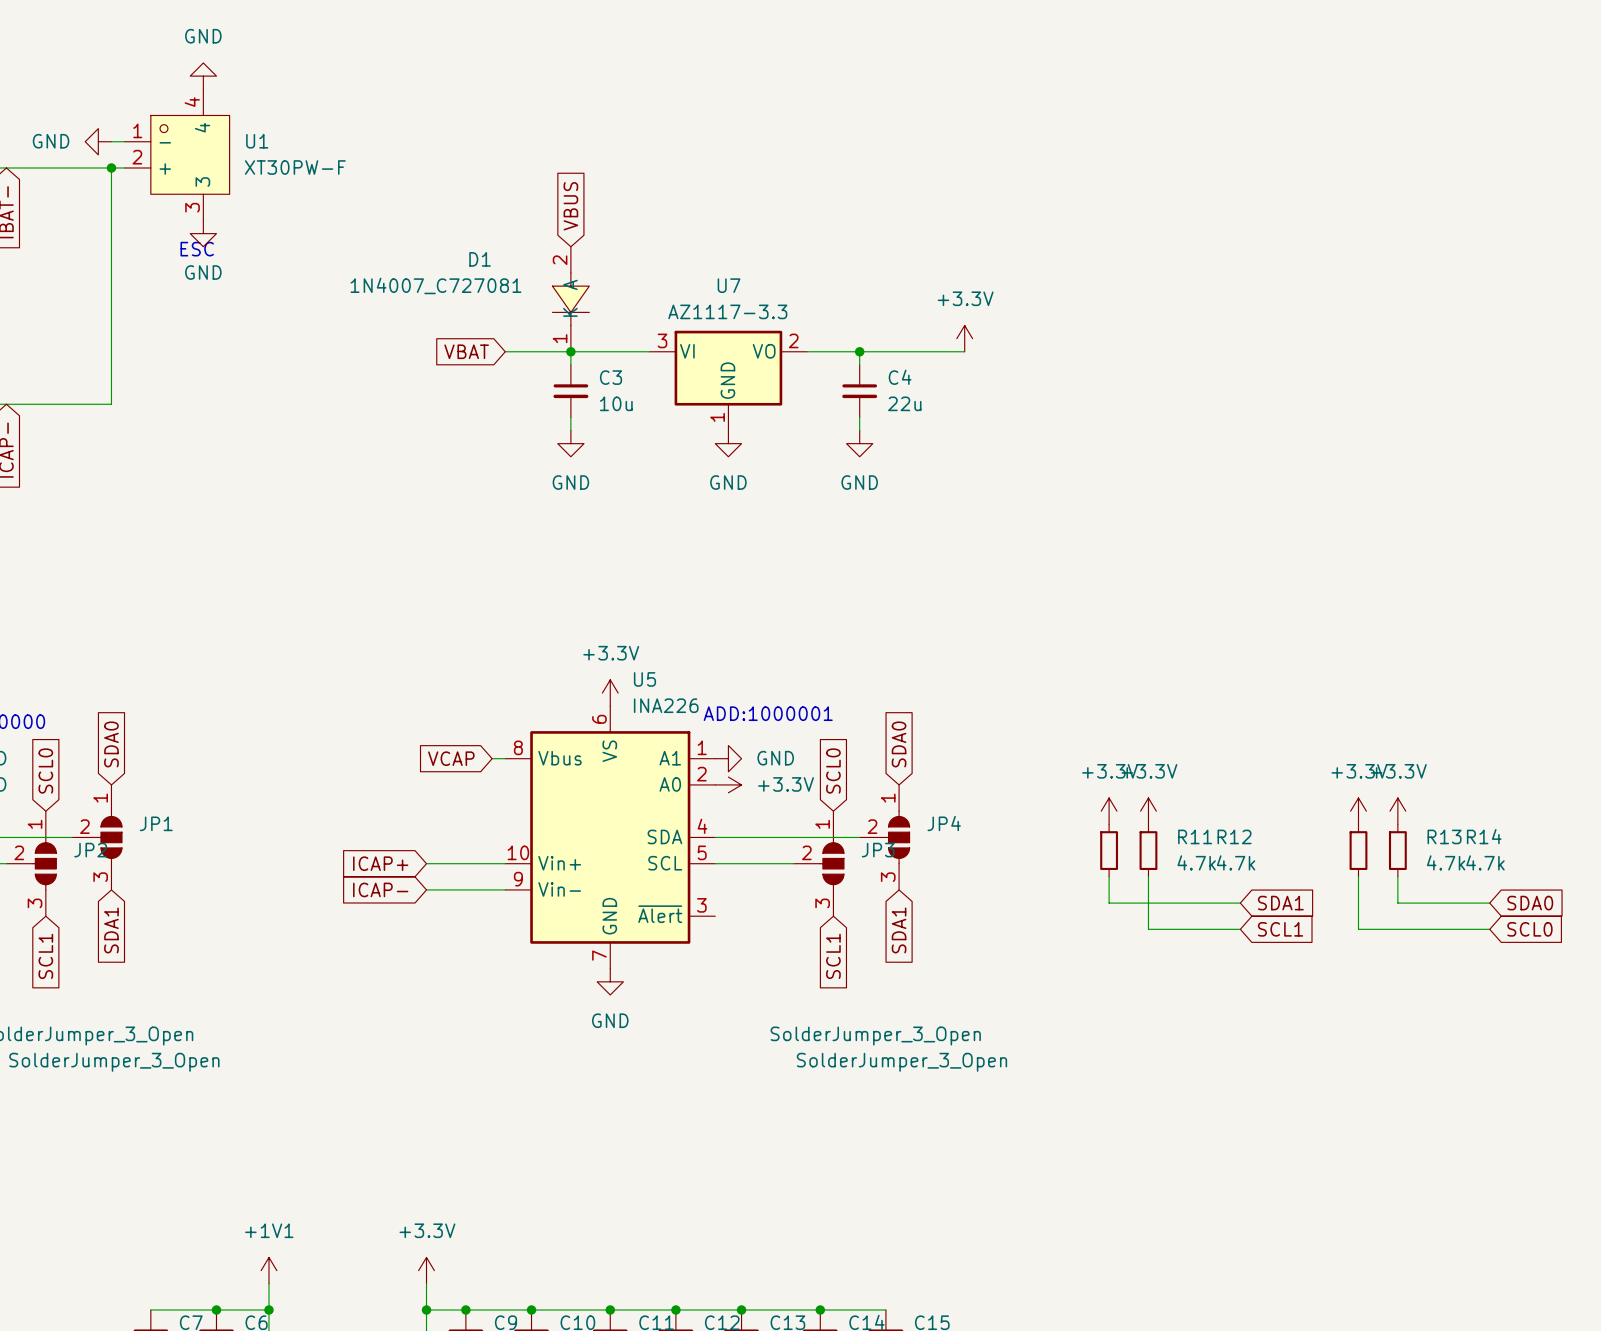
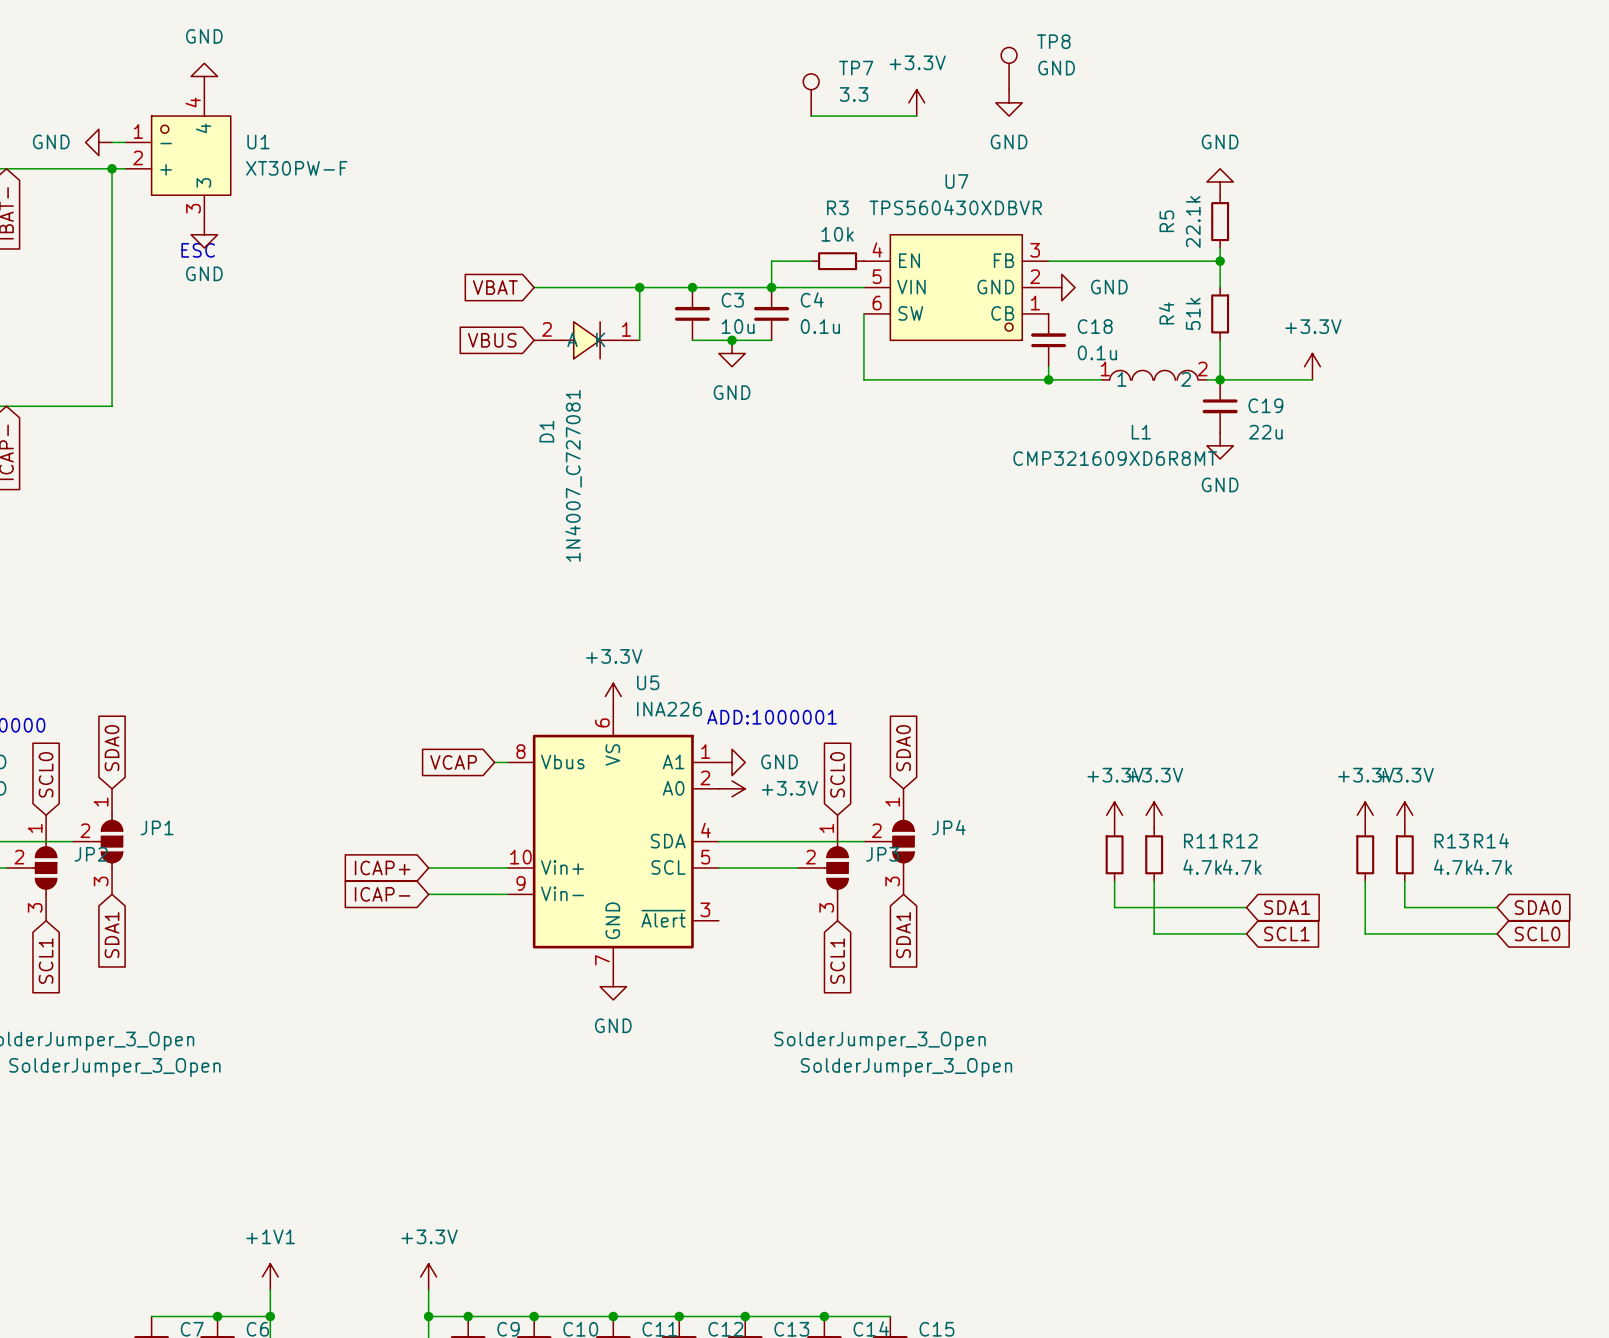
TP8: none -> GND (1009, 68)
TP7: none -> 3.3 (811, 94)
power symbol: none -> +3.3V (916, 102)
power symbol: none -> GND (1009, 102)
wire: none -> (811, 116) (916, 116)
power symbol: none -> GND (1220, 182)
global label rotation: 0° (570, 206) -> 90° counterclockwise (492, 340)
global label position: VBUS (570, 206) -> VBUS (492, 340)
R5: none -> 22.1k (1220, 221)
wire: none -> (1220, 247) (1220, 287)
wire: none -> (811, 261) (771, 261) (771, 287)
R3: none -> 10k (837, 261)
wire: none -> (1048, 261) (1220, 261)
junction: none -> (1220, 261)
wire: none -> (534, 287) (863, 287)
wire: none -> (639, 287) (639, 340)
junction: none -> (639, 287)
junction: none -> (692, 287)
junction: none -> (771, 287)
power symbol: none -> GND (1061, 287)
D1 rotation: 0° (570, 299) -> 90° counterclockwise (586, 340)
U7 value: AZ1117-3.3 (727, 311) -> TPS560430XDBVR (955, 207)
wire: none -> (863, 313) (863, 353)
R4: none -> 51k (1220, 313)
U7 symbol: [649, 330, 808, 431] -> [863, 234, 1049, 341]
junction: none -> (732, 340)
power symbol: +3.3V (964, 338) -> none
C18: none -> 0.1u (1048, 340)
wire: none -> (1220, 340) (1220, 379)
global label position: VBAT (466, 351) -> VBAT (495, 287)
wire: (505, 351) (649, 351) -> none
wire: (570, 351) (570, 364) -> none
junction: (570, 351) -> none
power symbol: none -> GND (732, 353)
wire: (807, 351) (964, 351) -> none
junction: (859, 351) -> none
wire: none -> (863, 366) (863, 379) (1101, 379)
power symbol: none -> +3.3V (1312, 366)
L1: none -> CMP321609XD6R8MT (1154, 375)
junction: none -> (1048, 379)
wire: none -> (1206, 379) (1312, 379)
junction: none -> (1220, 379)
C3 rotation: 0° (570, 391) -> 180° (692, 313)
C3 position: (570, 391) -> (692, 313)
C4 rotation: 0° (859, 391) -> 180° (771, 313)
C4 position: (859, 391) -> (771, 313)
C4 value: 22u (904, 403) -> 0.1u (820, 326)
C19: none -> 22u (1220, 406)
wire: (570, 417) (570, 430) -> none
wire: (859, 417) (859, 430) -> (1048, 366) (1048, 379)
power symbol: GND (570, 443) -> none
power symbol: GND (728, 443) -> none
power symbol: GND (859, 443) -> none
power symbol: none -> GND (1220, 445)

